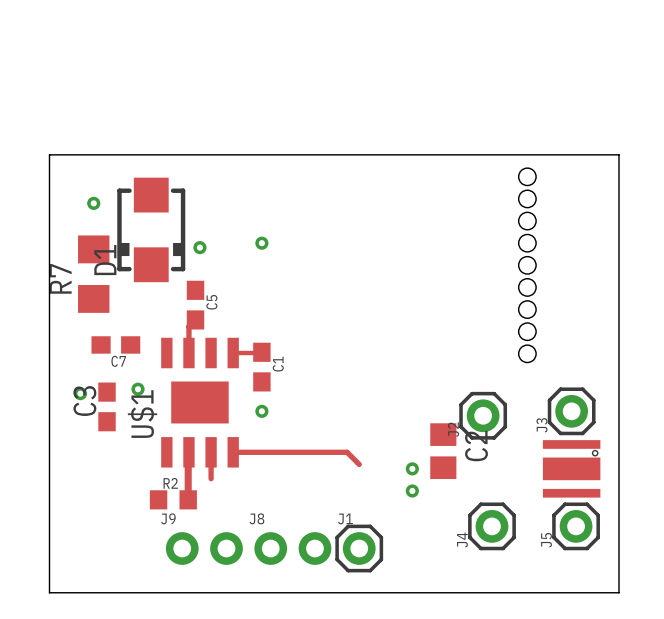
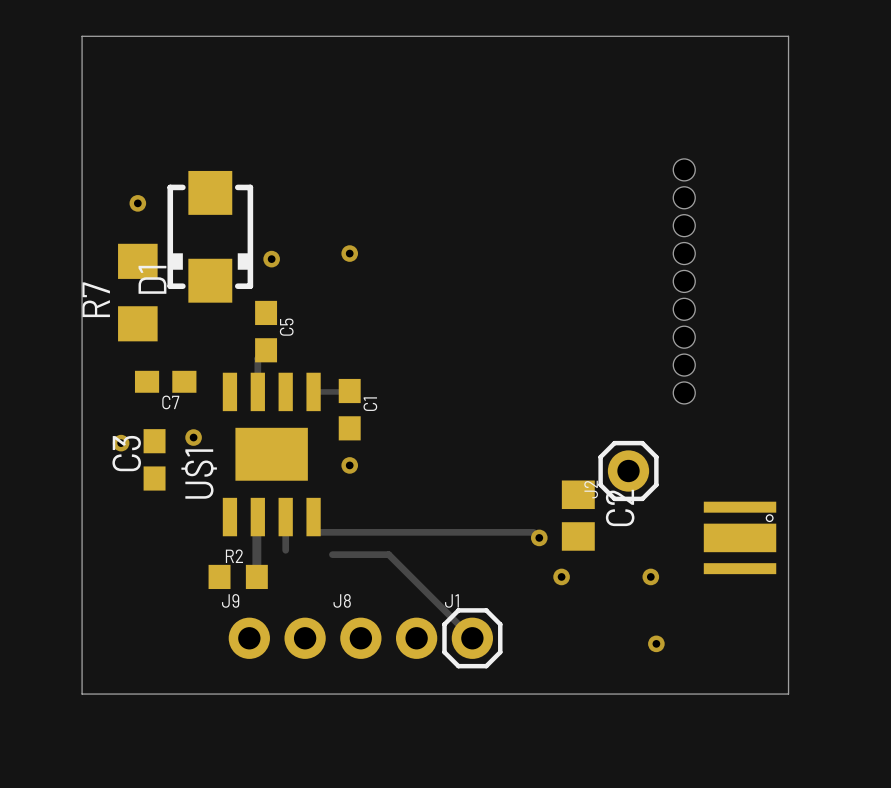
board edge: (49, 154) (618, 154) (618, 592) (610, 592) -> (82, 142) (82, 36) (788, 36) (788, 694)
J3: (571, 411) -> none
track: (233, 452) (347, 452) (359, 464) -> none
track: none -> (313, 532) (533, 532)
track: none -> (332, 554) (388, 554) (472, 638)
via position: (412, 490) -> (561, 576)
via: none -> (650, 576)
J4: (491, 526) -> none
J5: (576, 526) -> none
via: none -> (656, 643)

